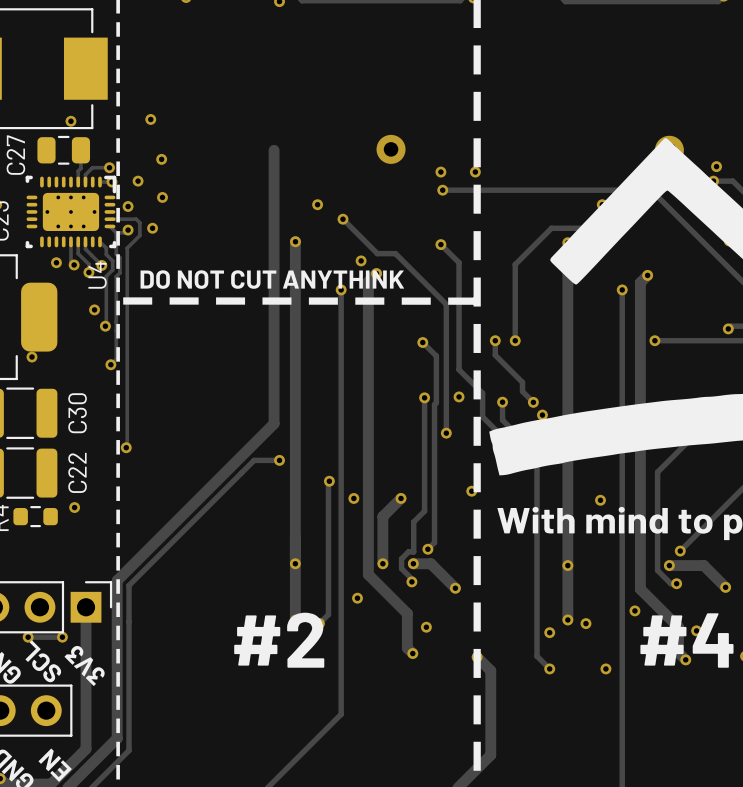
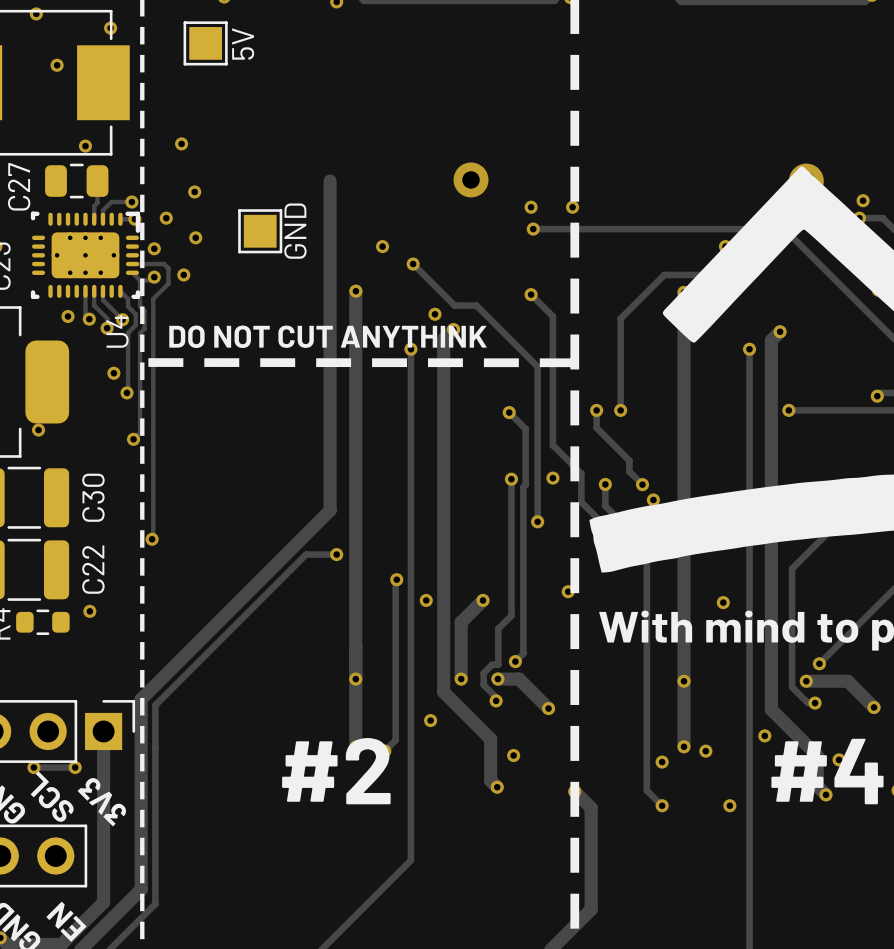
via: none -> (36, 13)
via: none -> (110, 28)
5V: none -> (205, 43)
via: none -> (57, 65)
GND: none -> (260, 231)

